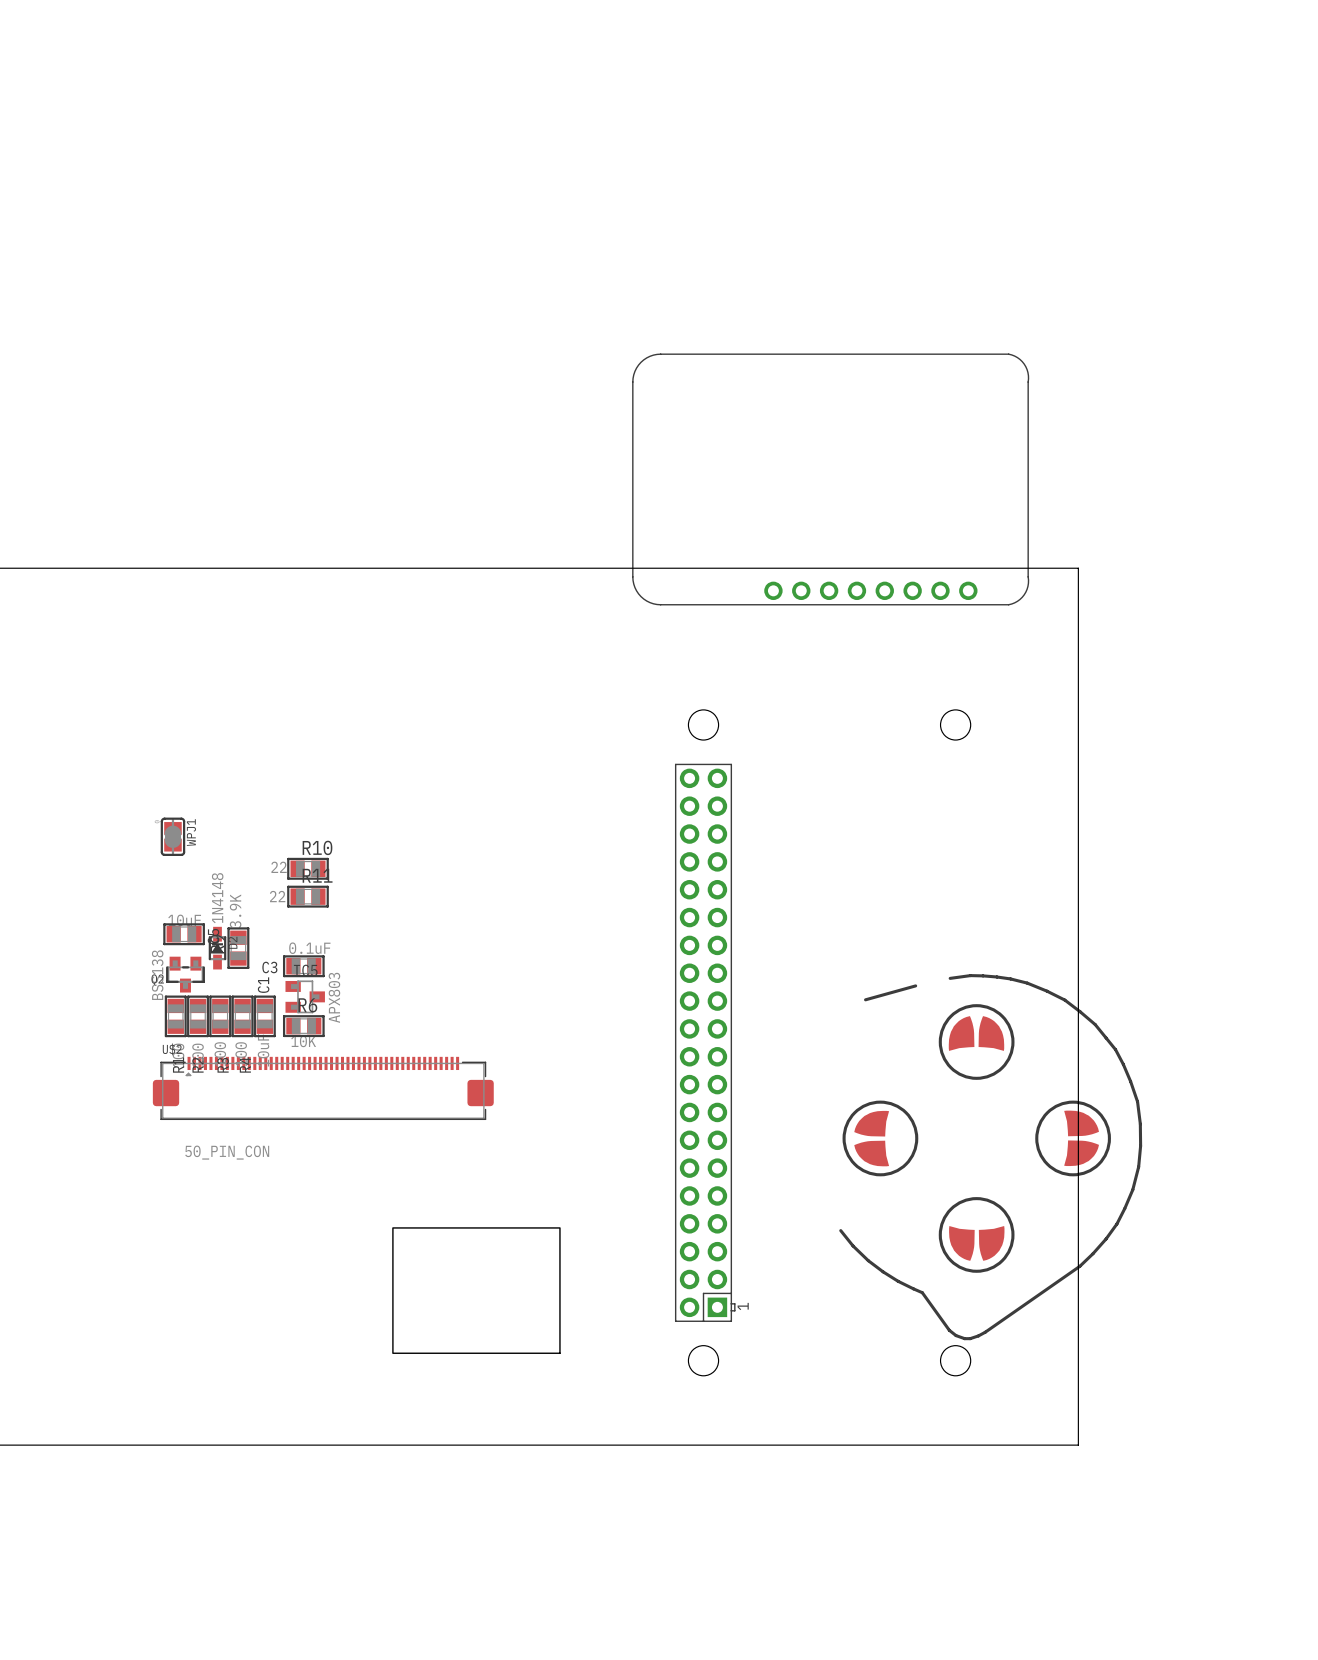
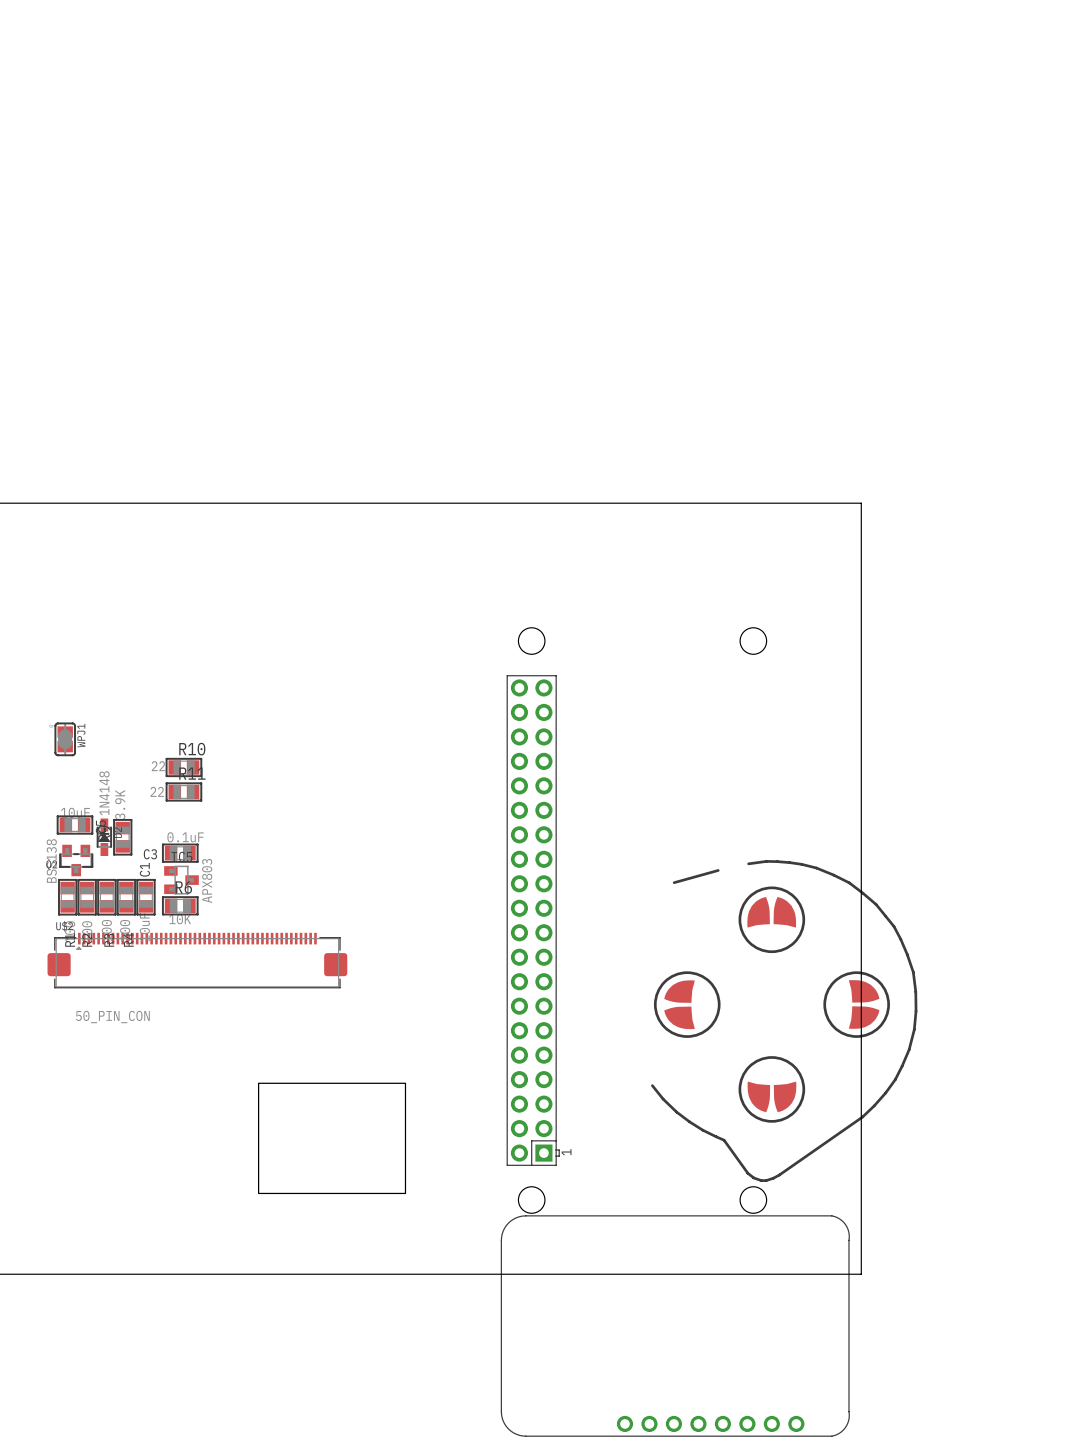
part: (830, 479) -> none
part: none -> (675, 1326)

